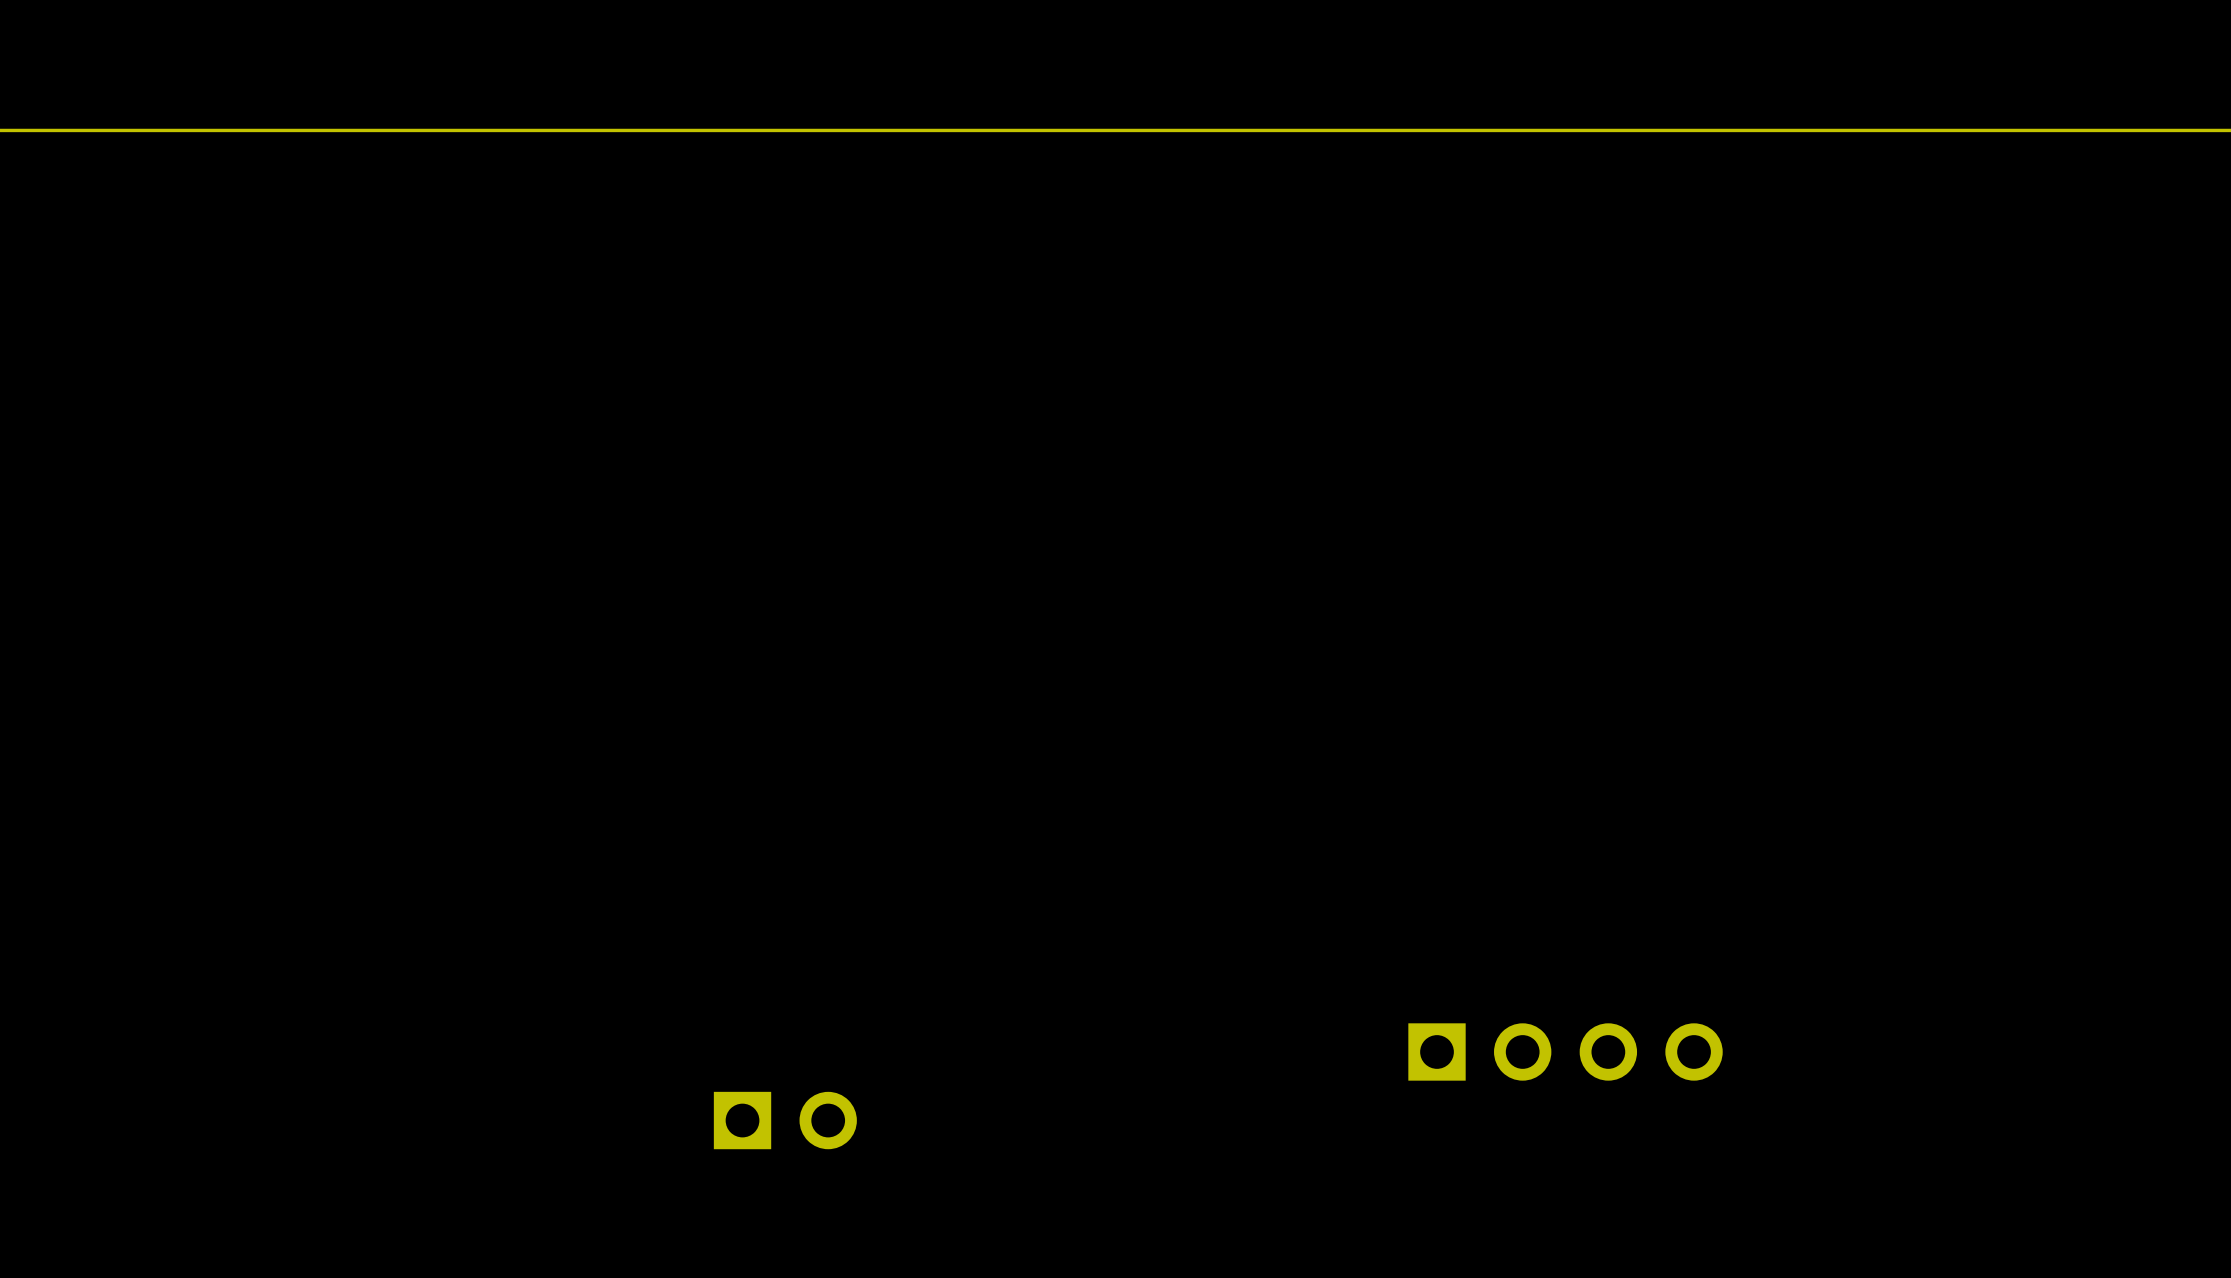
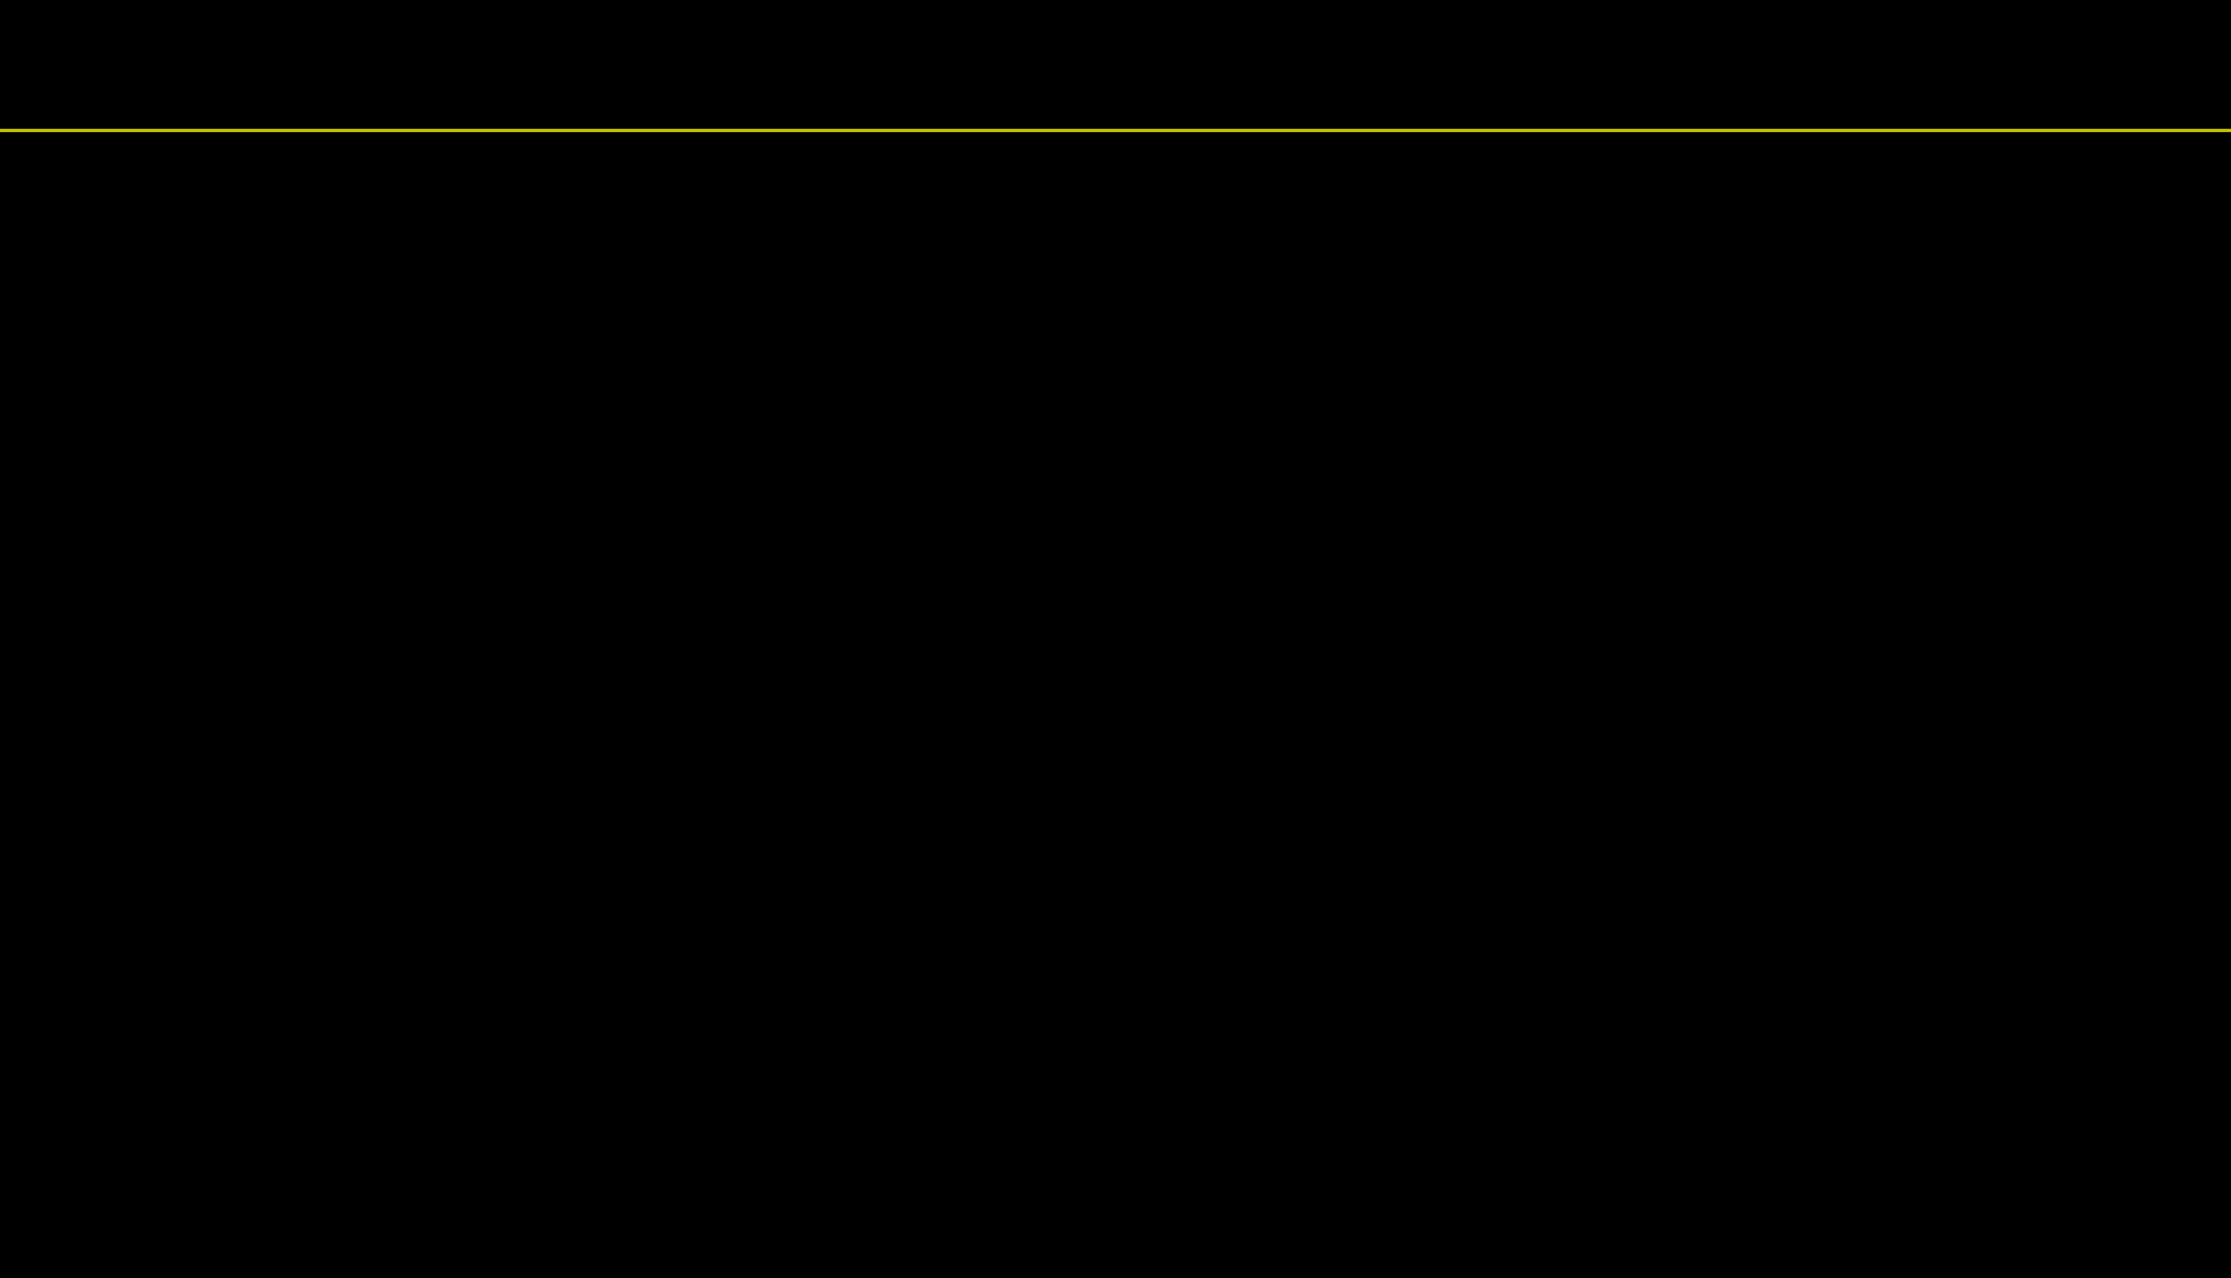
part: (1565, 1051) -> none
part: (785, 1120) -> none

